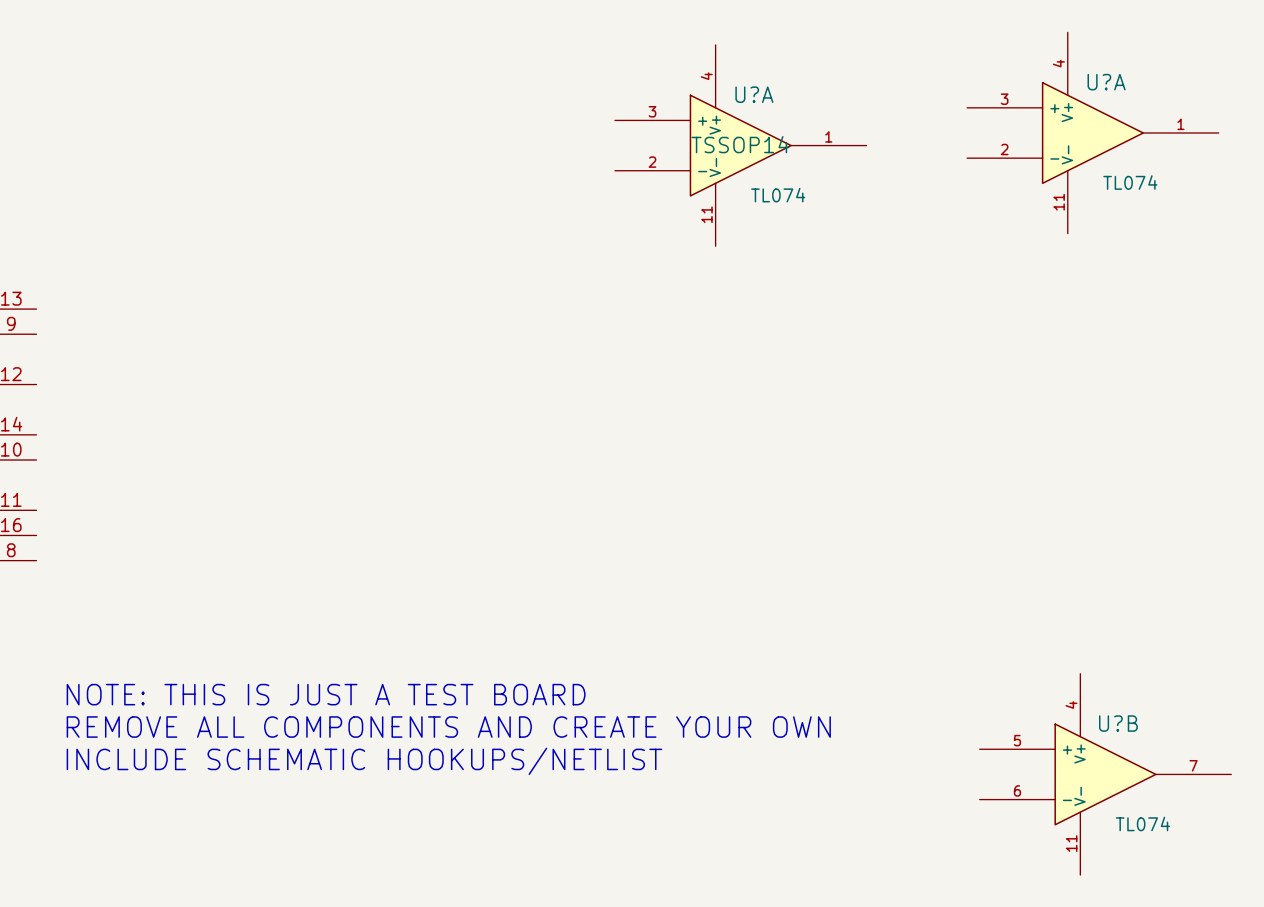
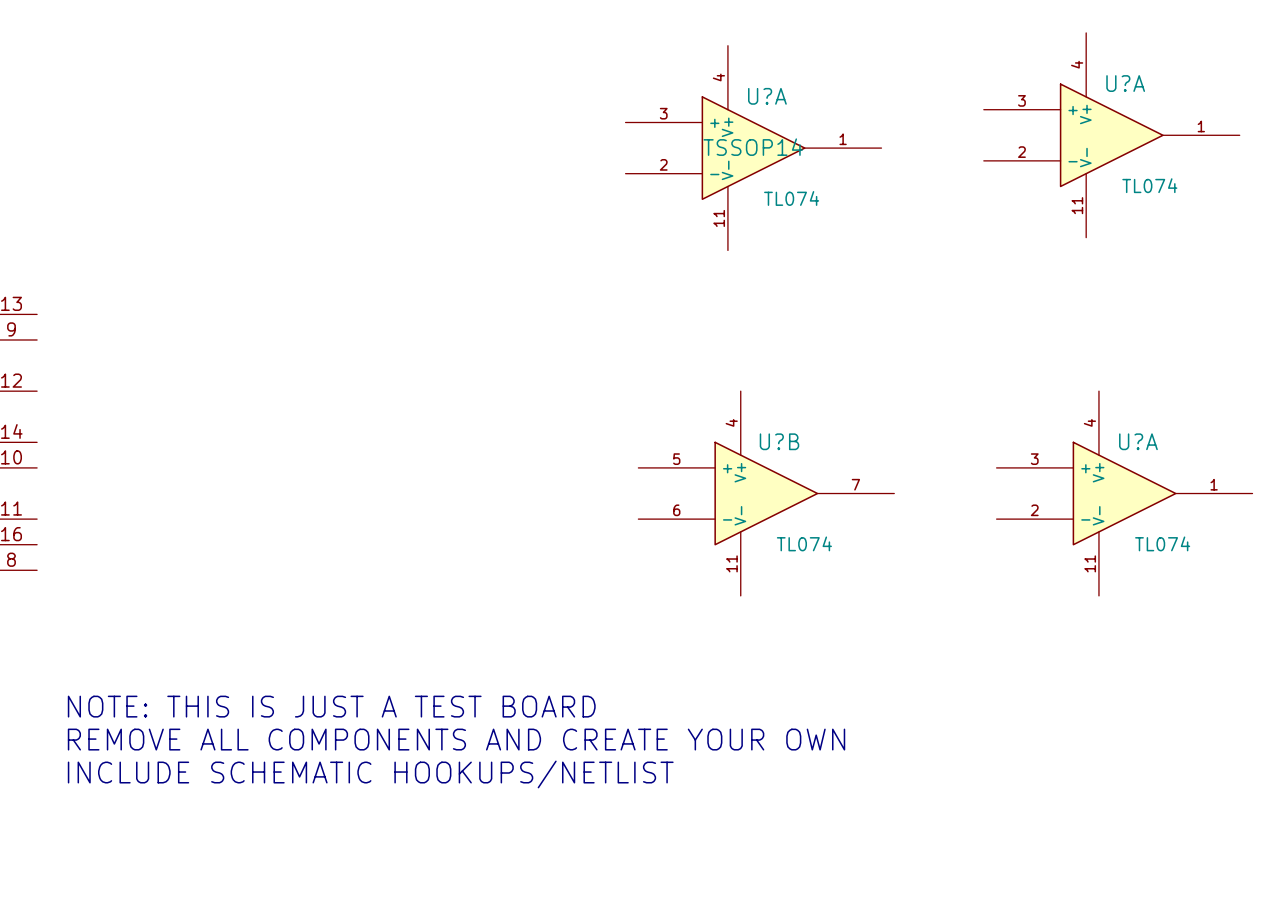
U?B: none -> TL074 (766, 493)
U?A: none -> TL074 (1124, 493)
U?B: TL074 (1105, 774) -> none

